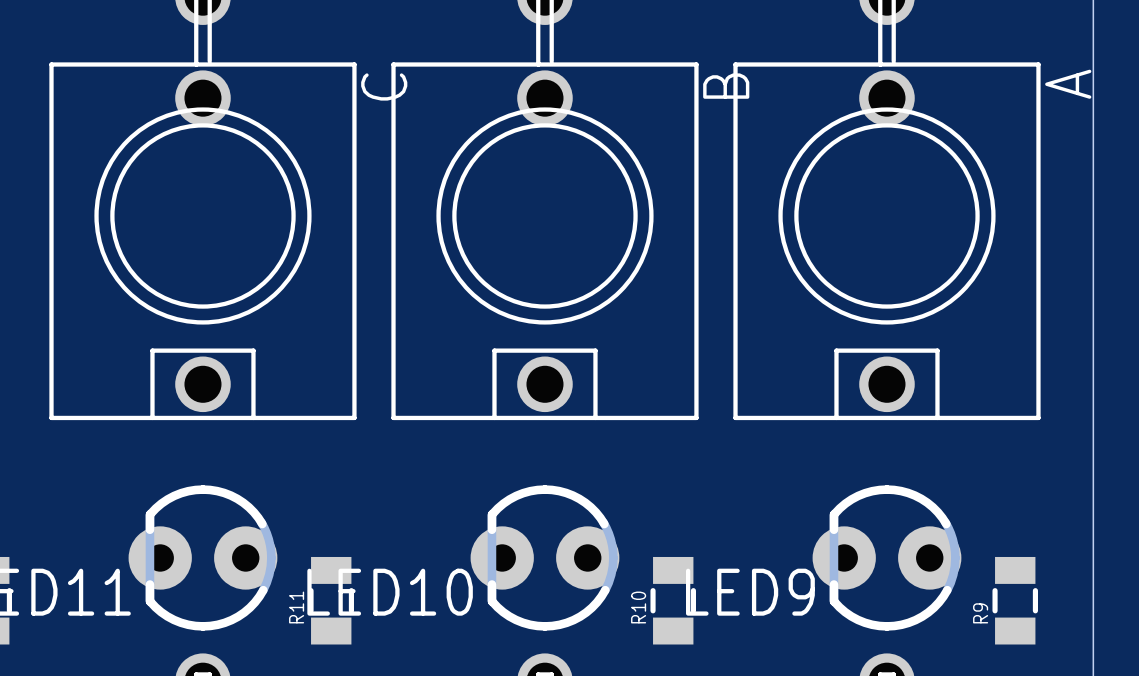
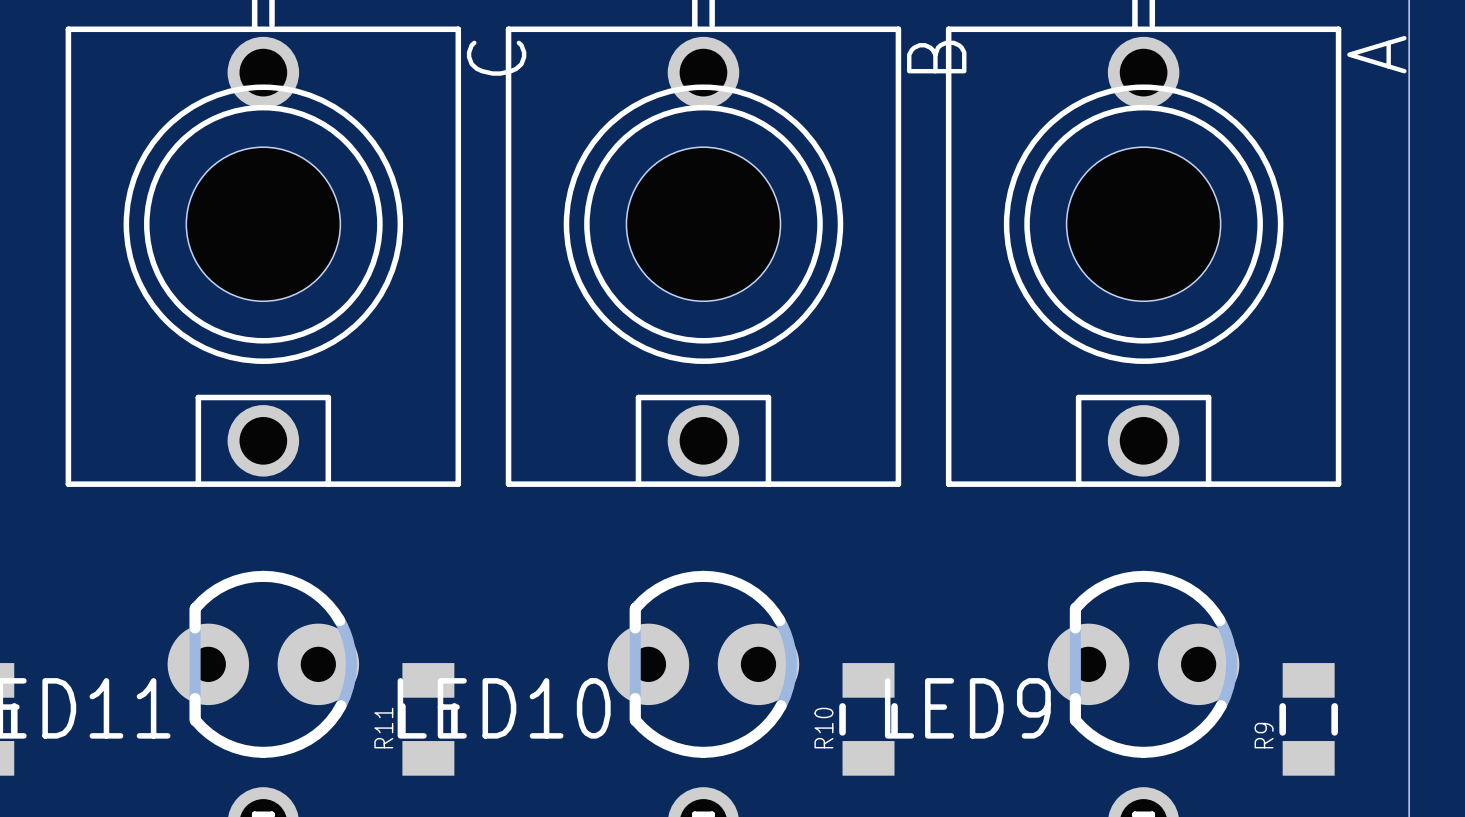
hole: none -> (263, 224)
hole: none -> (703, 224)
hole: none -> (1143, 224)

